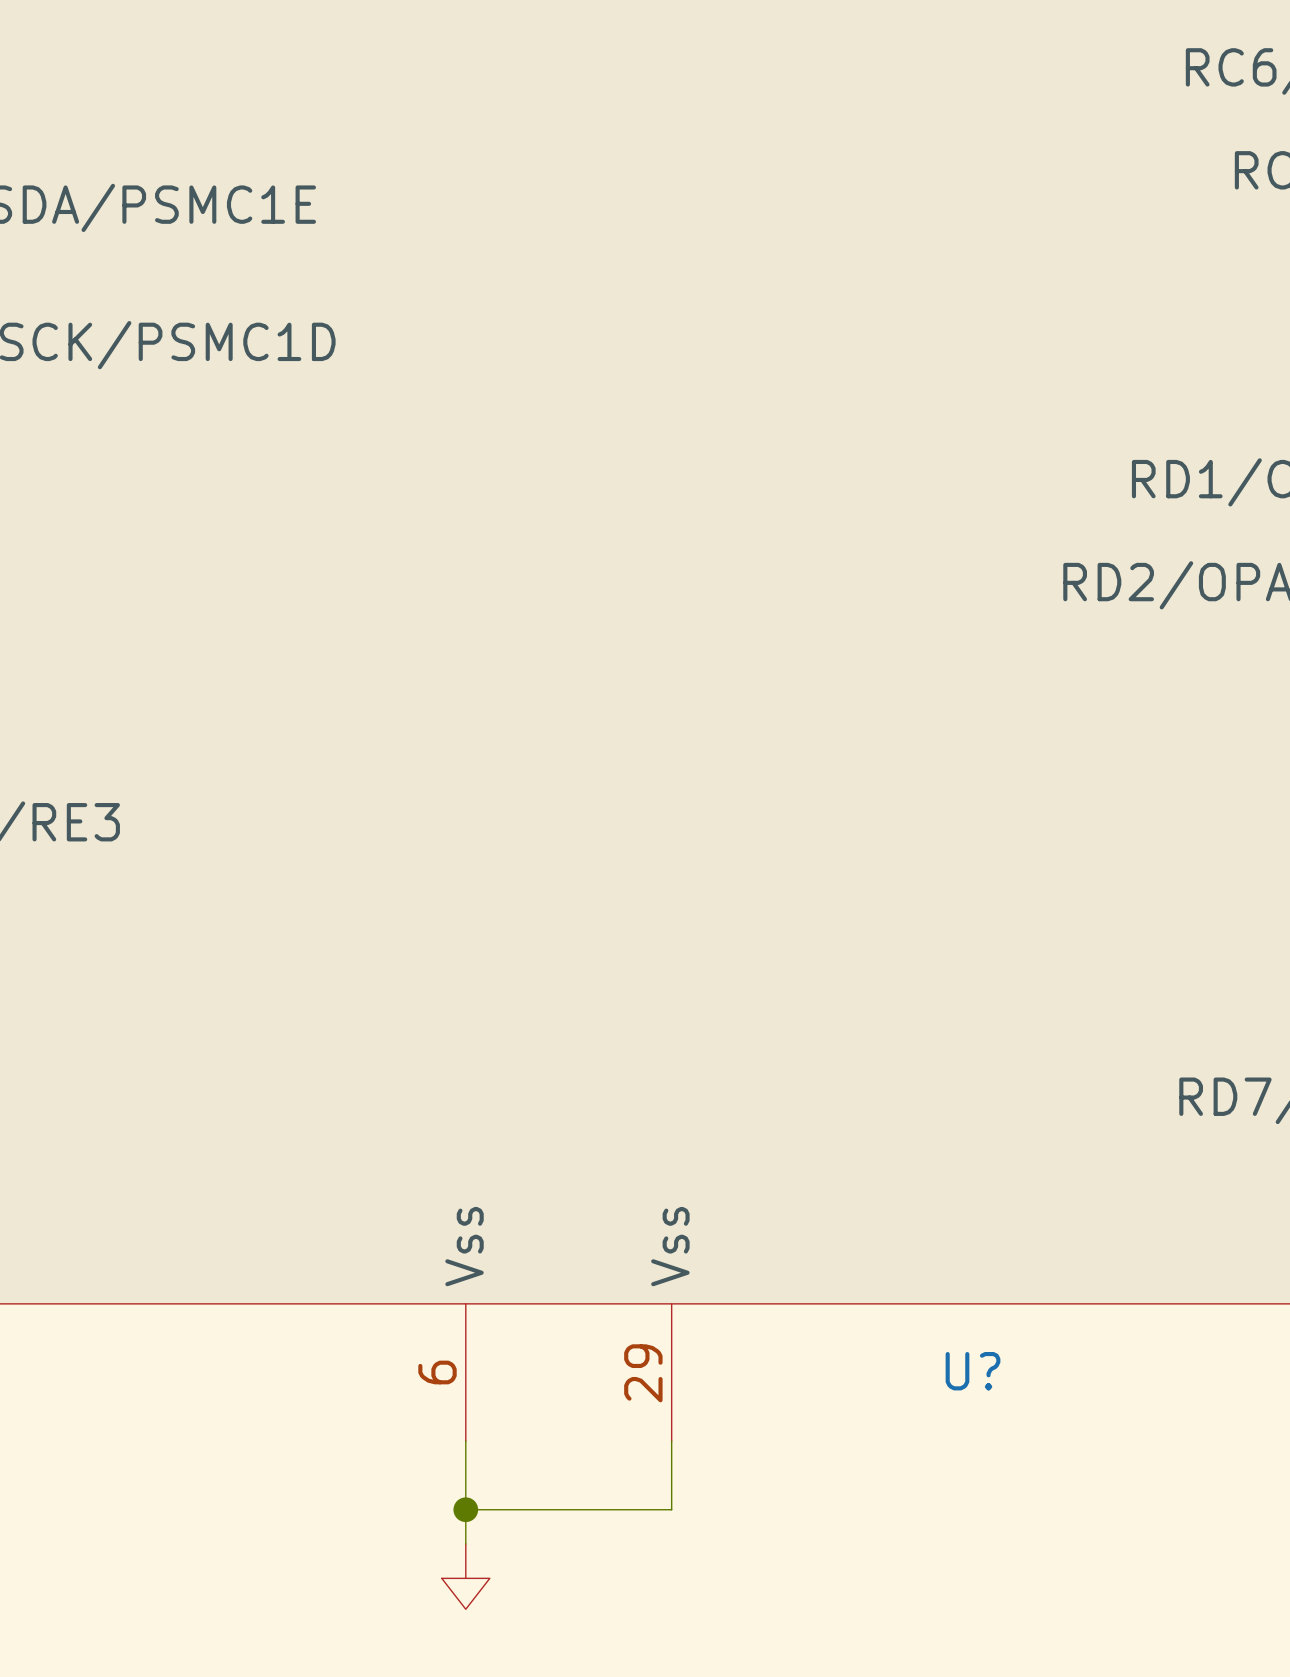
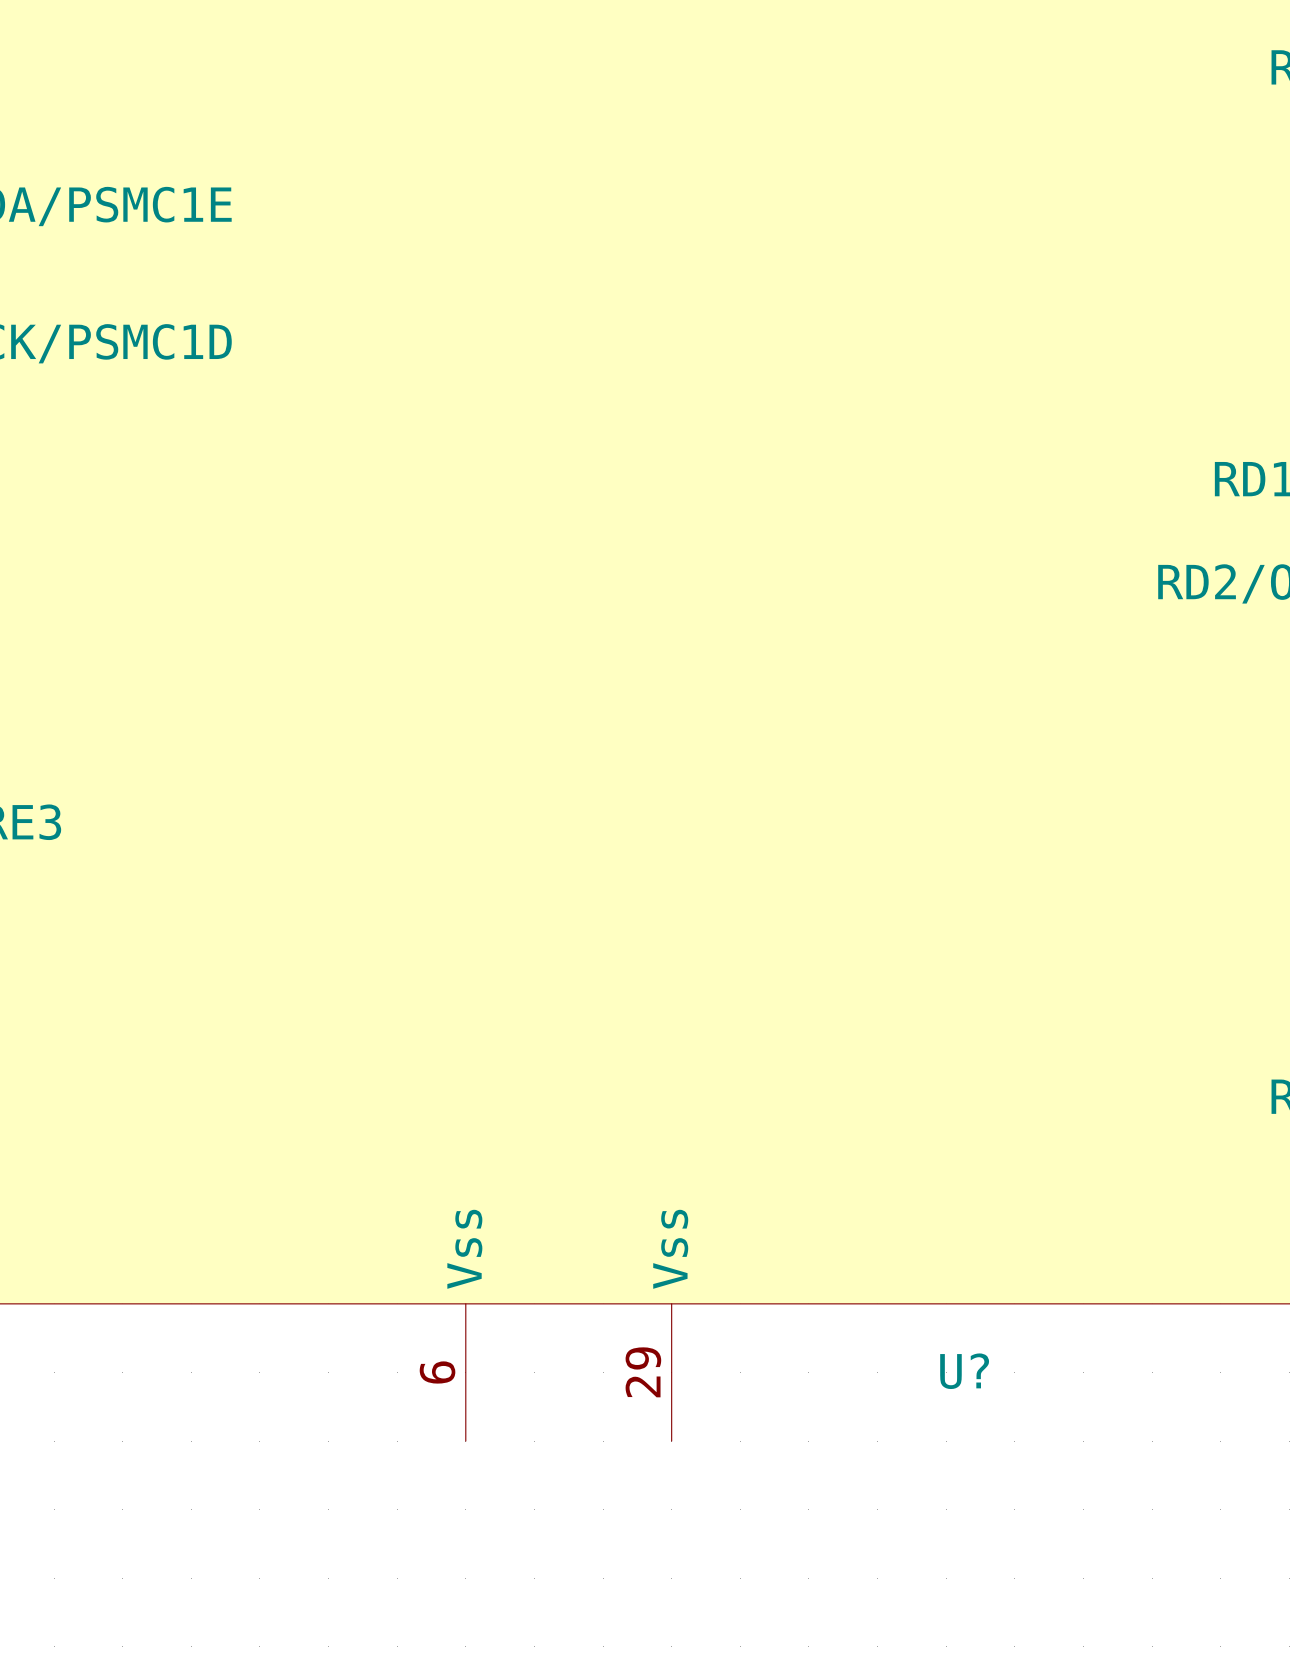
wire: (465, 1441) (465, 1544) -> none
wire: (671, 1441) (671, 1509) (465, 1509) -> none
junction: (465, 1509) -> none
power symbol: (465, 1576) -> none

